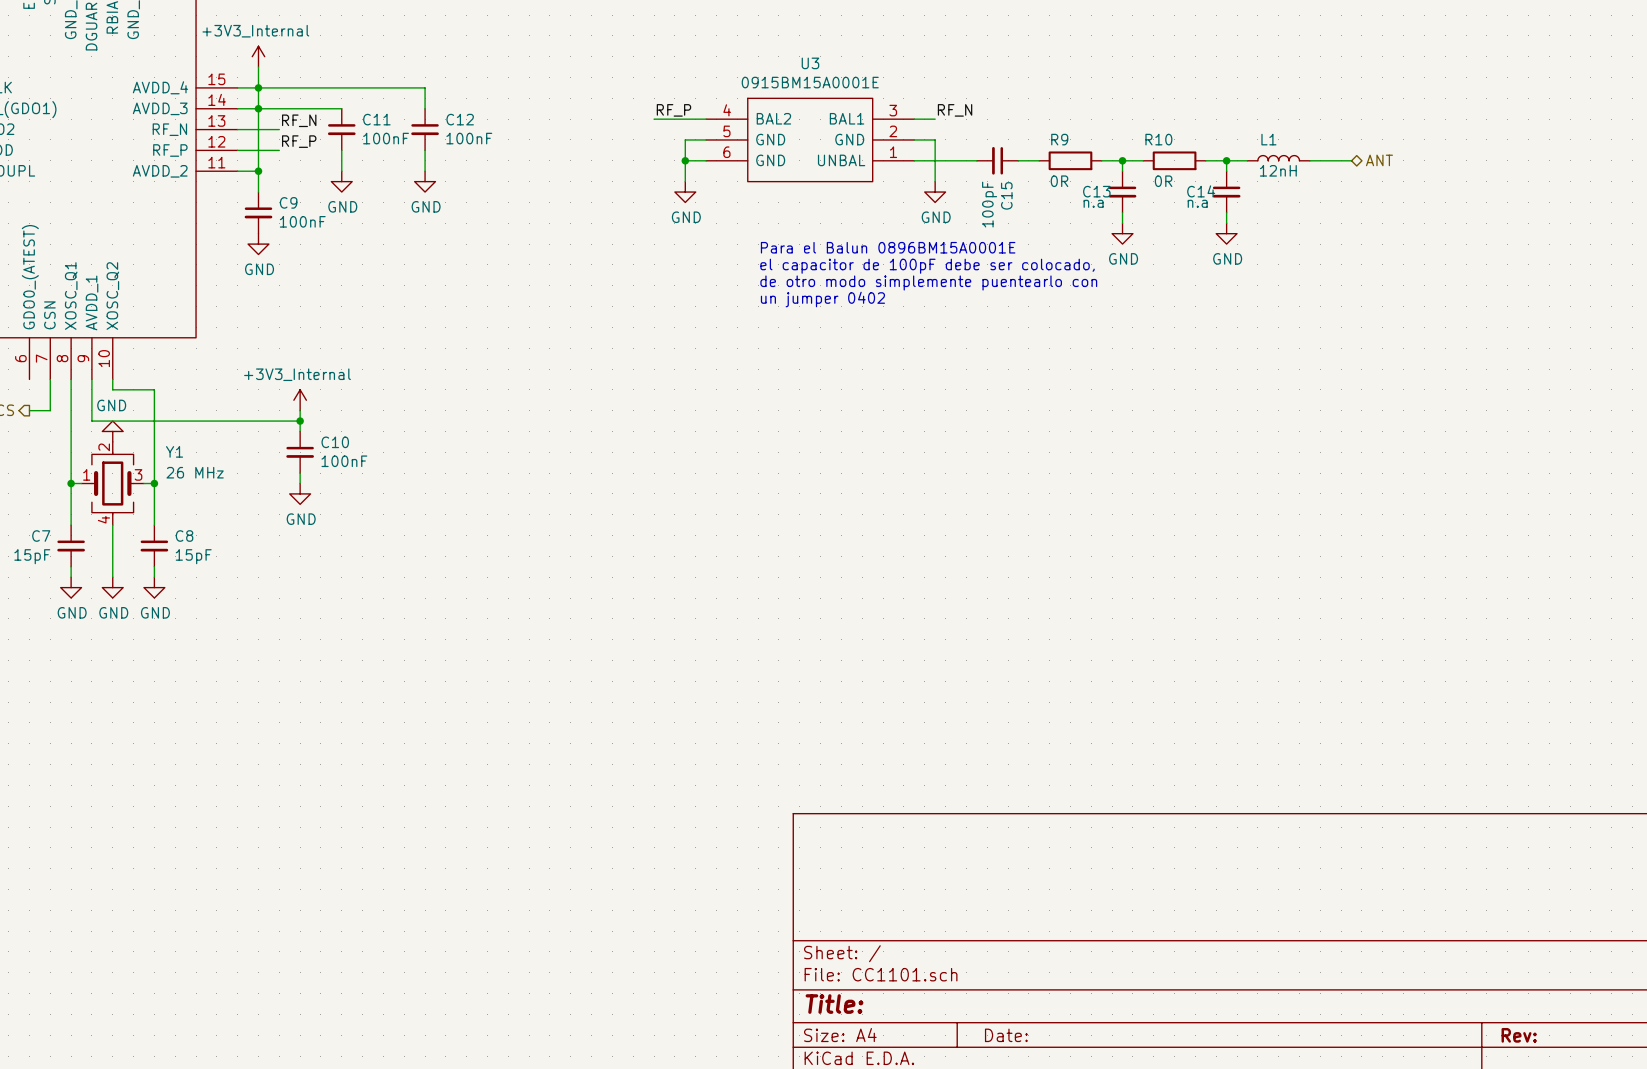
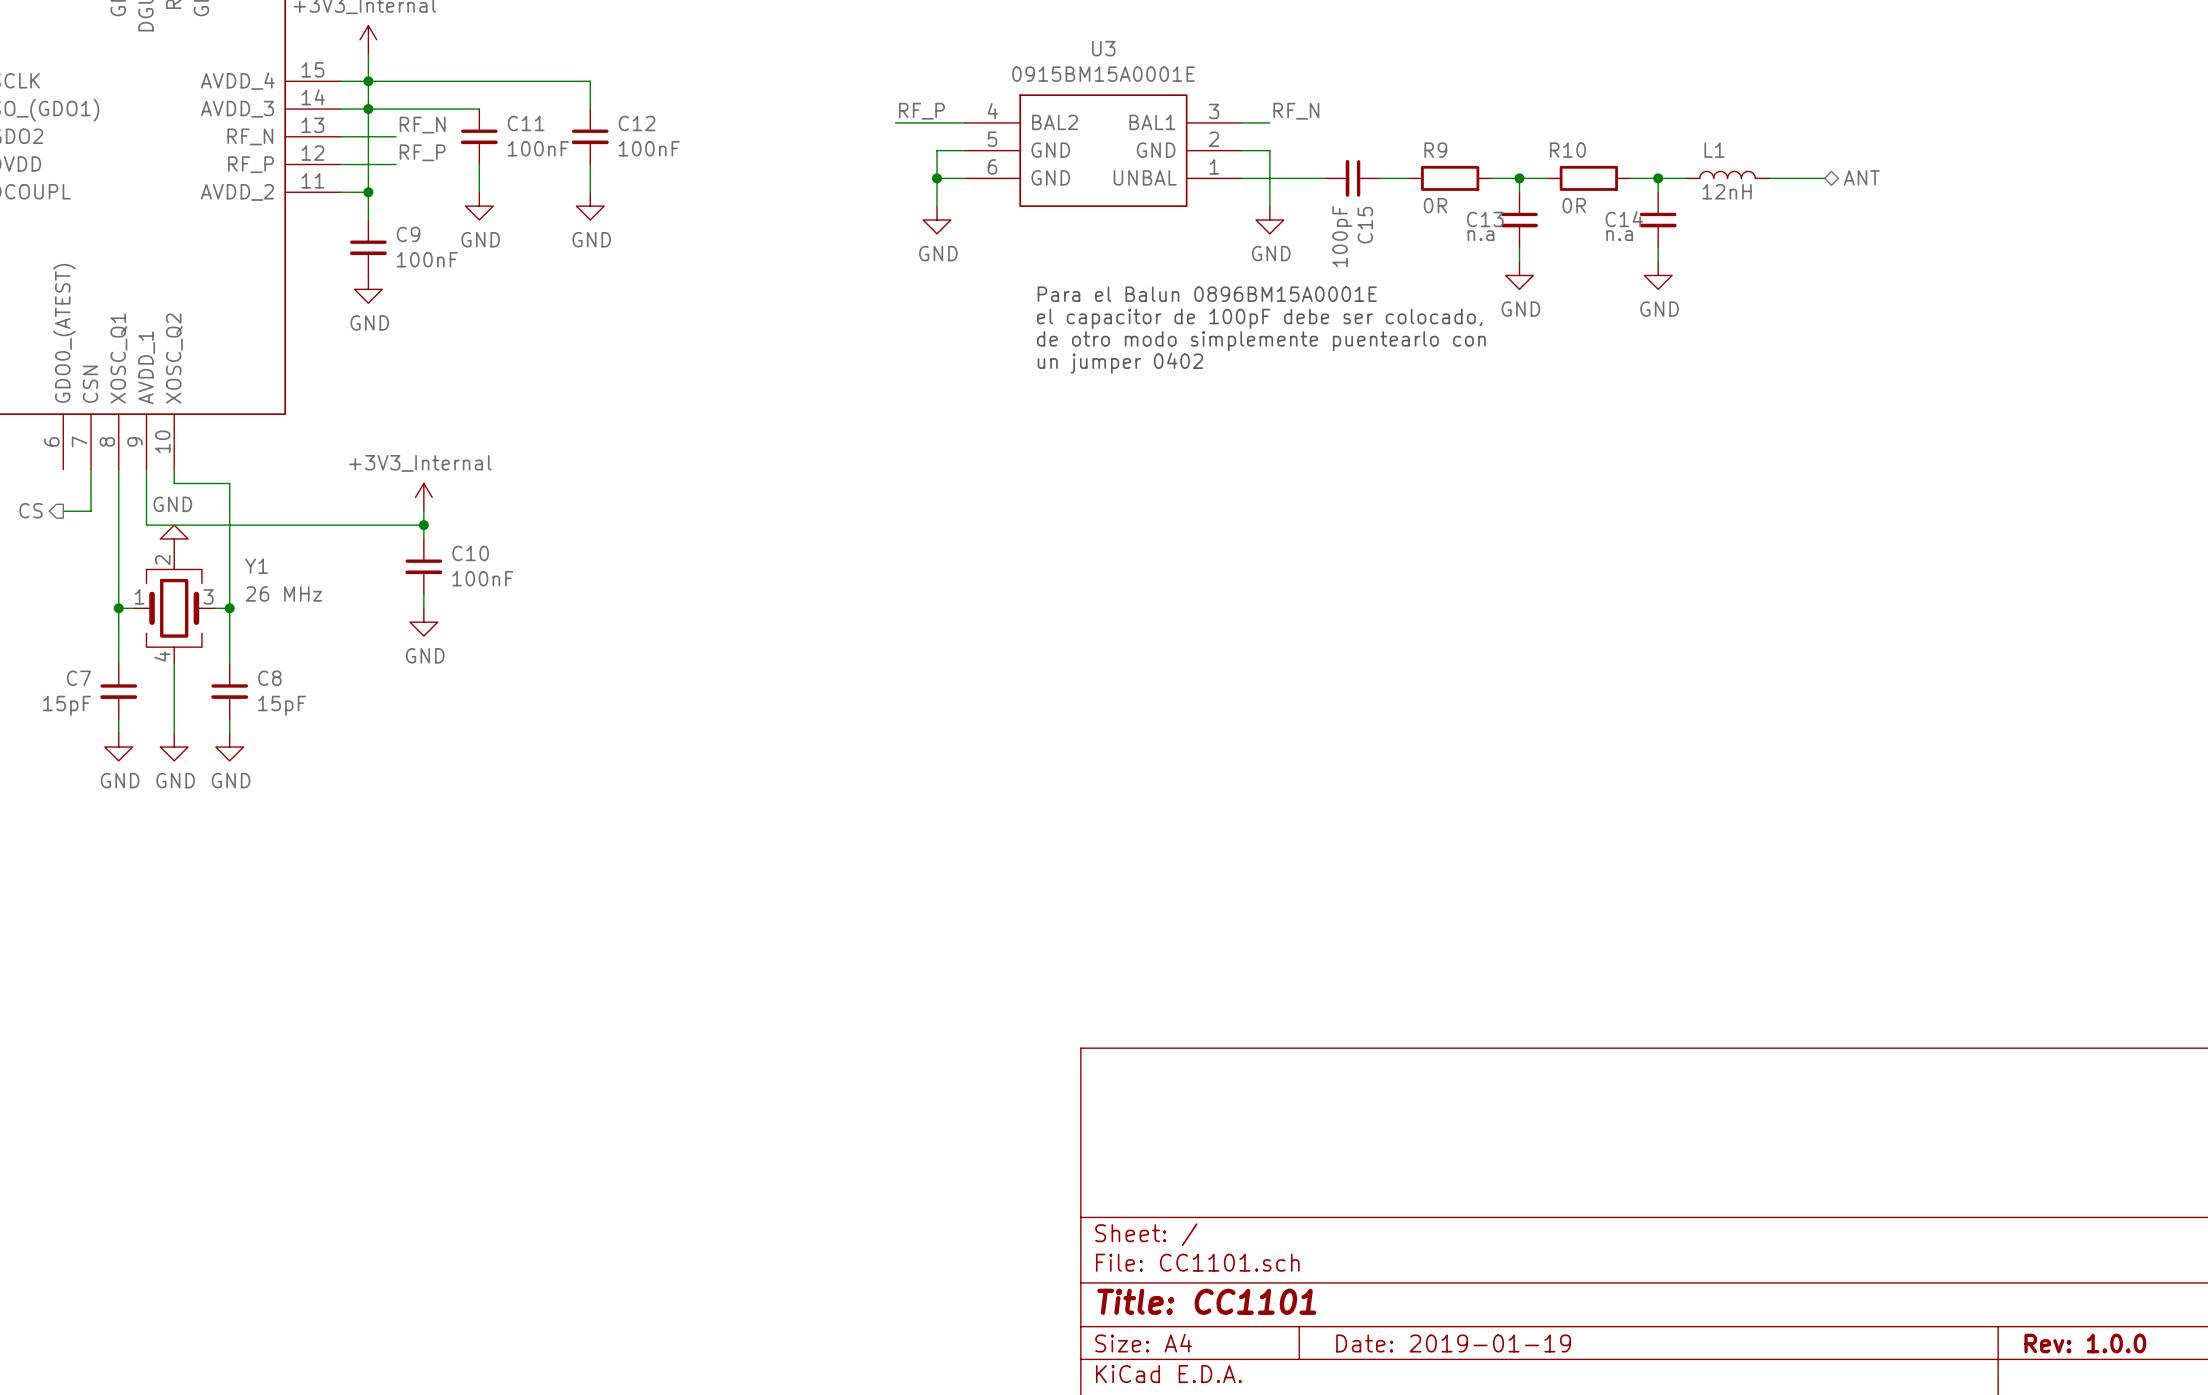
title block: Title: (834, 1004) -> Title: CC1101 (1206, 1301)
title block: Date: (1006, 1035) -> Date: 2019-01-19 (1453, 1343)
title block: Rev: (1519, 1035) -> Rev: 1.0.0 (2085, 1343)

